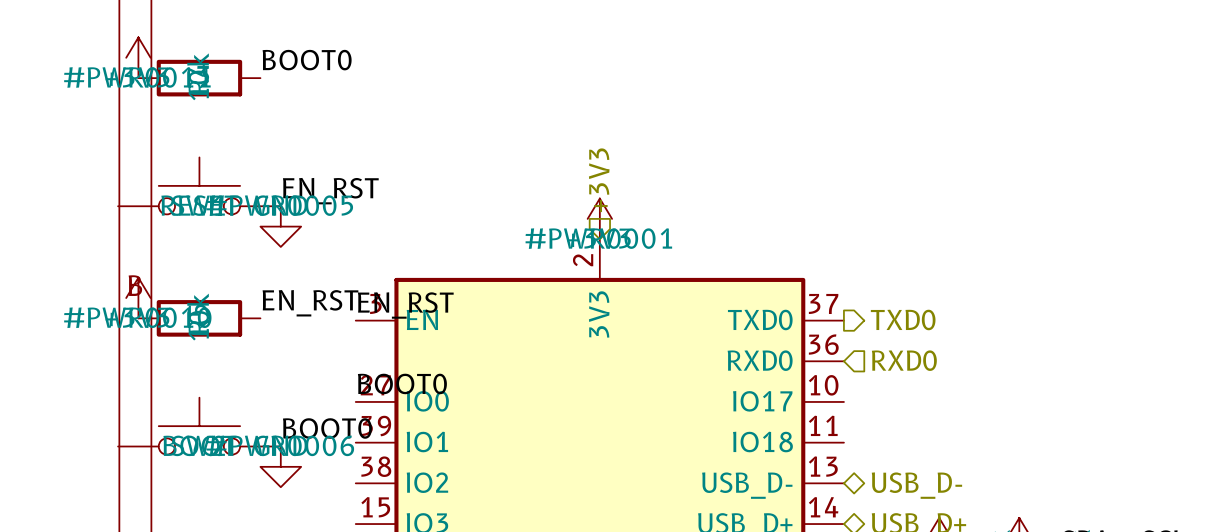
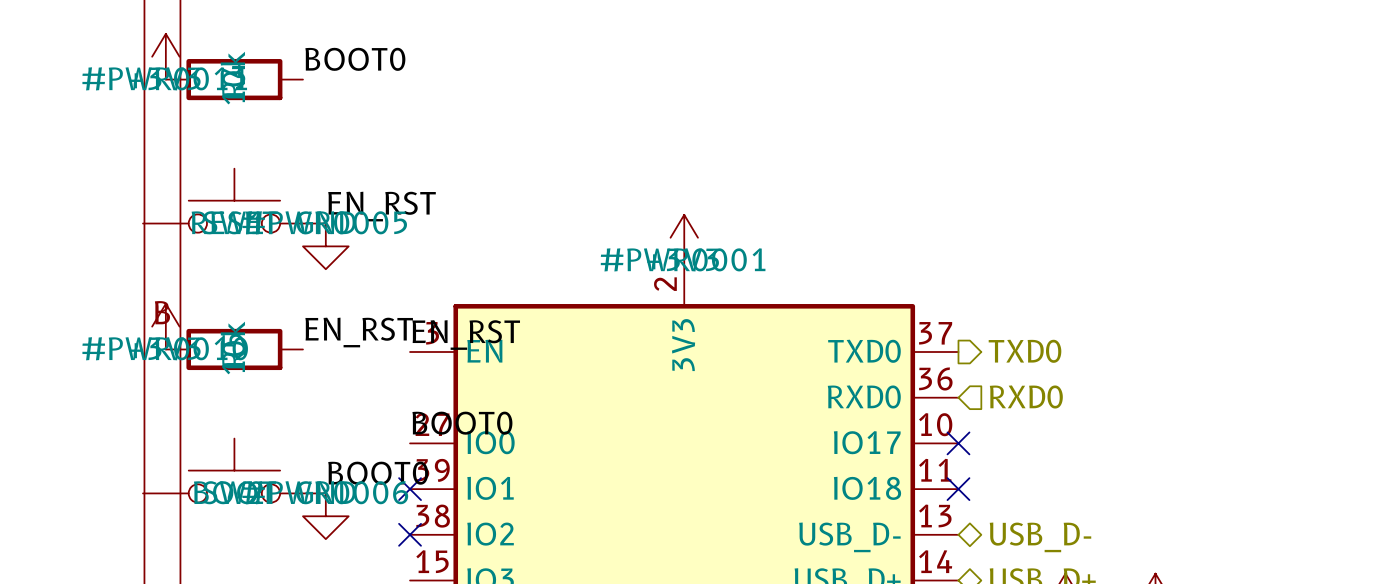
hierarchical label: +3V3 (599, 180) -> none
no-connect mark: none -> (958, 443)
no-connect mark: none -> (410, 489)
no-connect mark: none -> (958, 489)
no-connect mark: none -> (410, 534)

